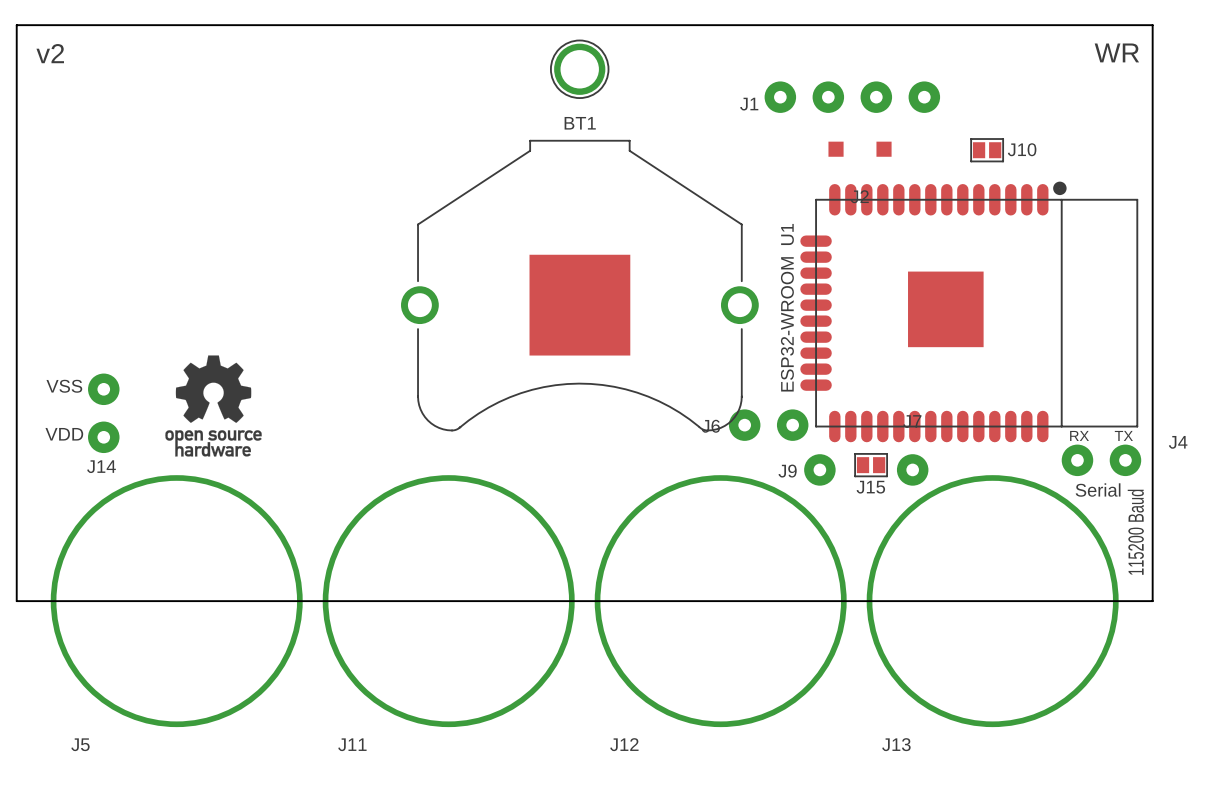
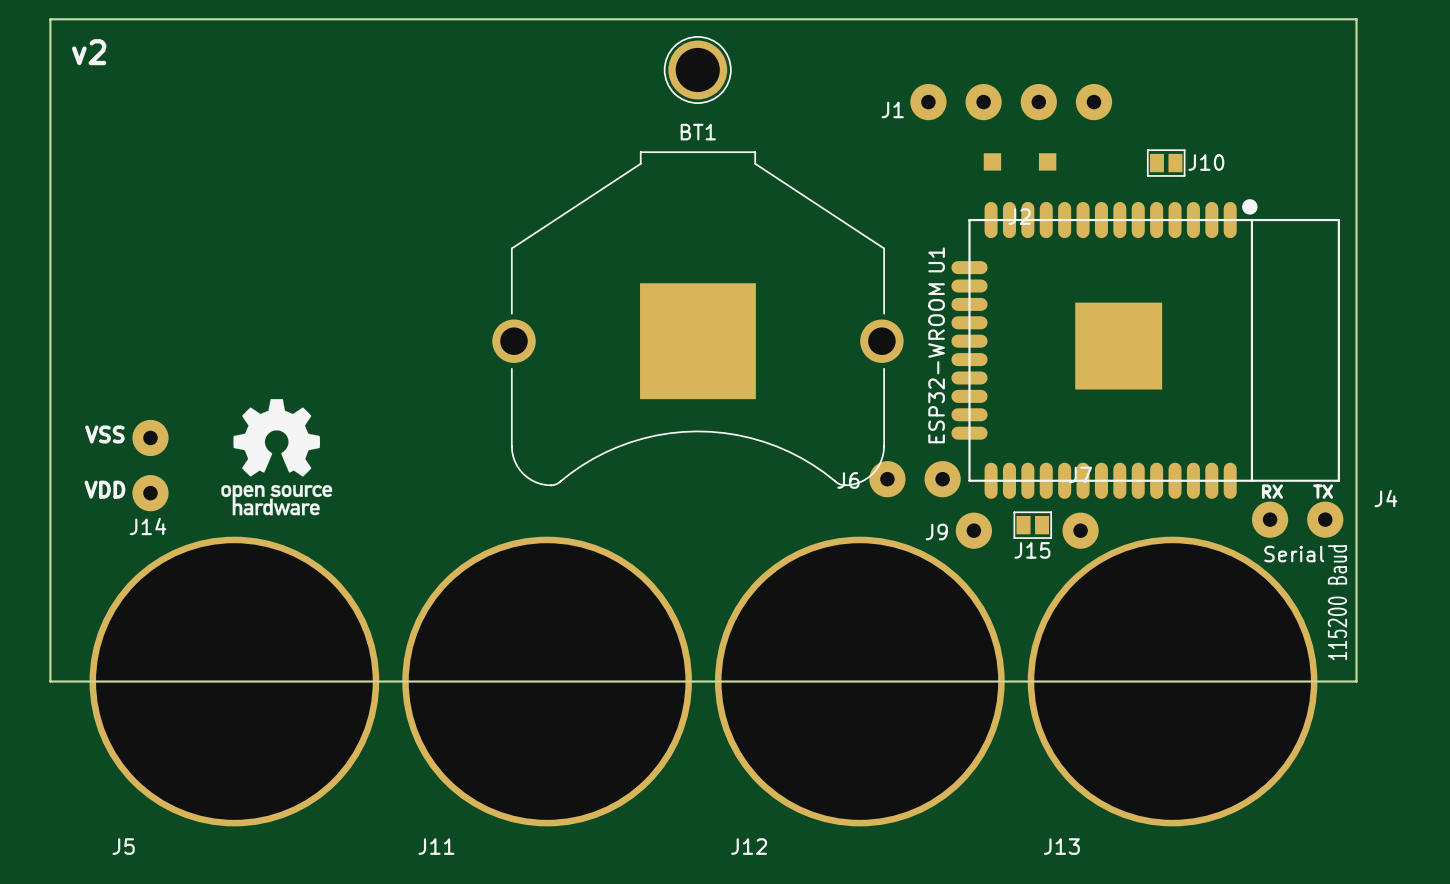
text: WR (1116, 52) -> none

